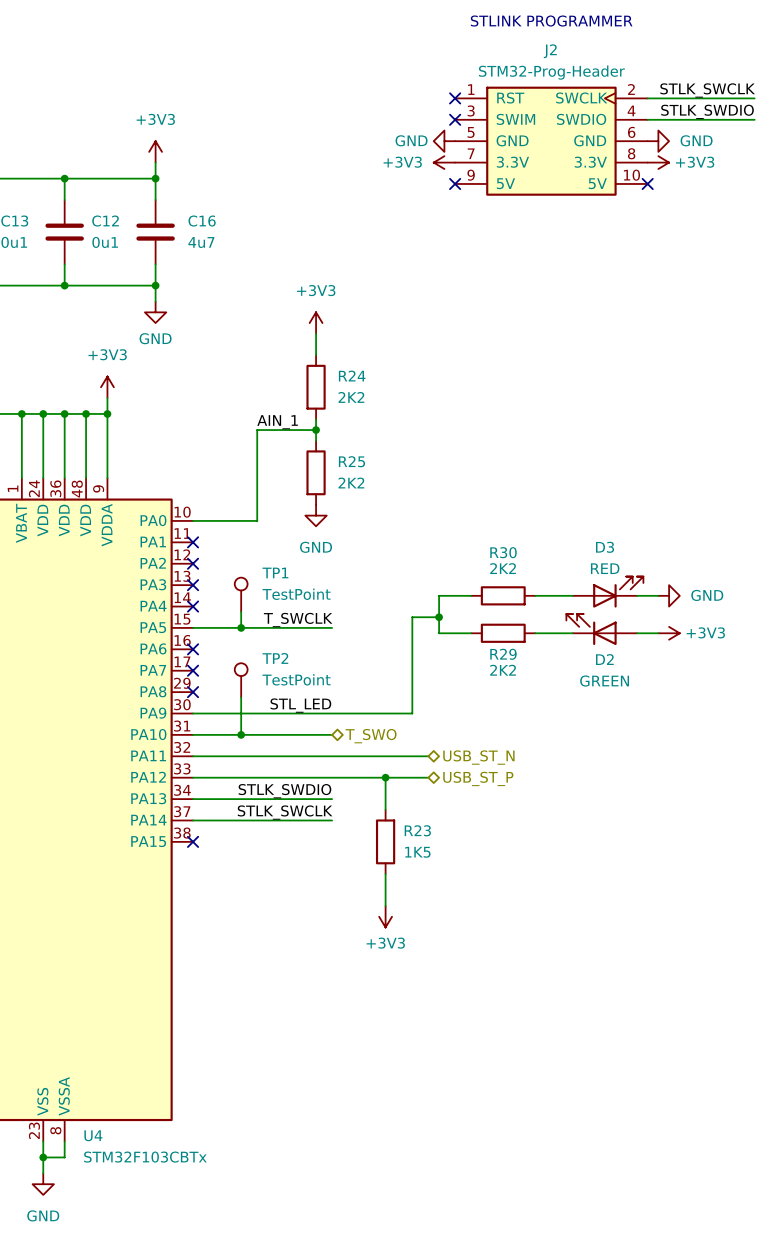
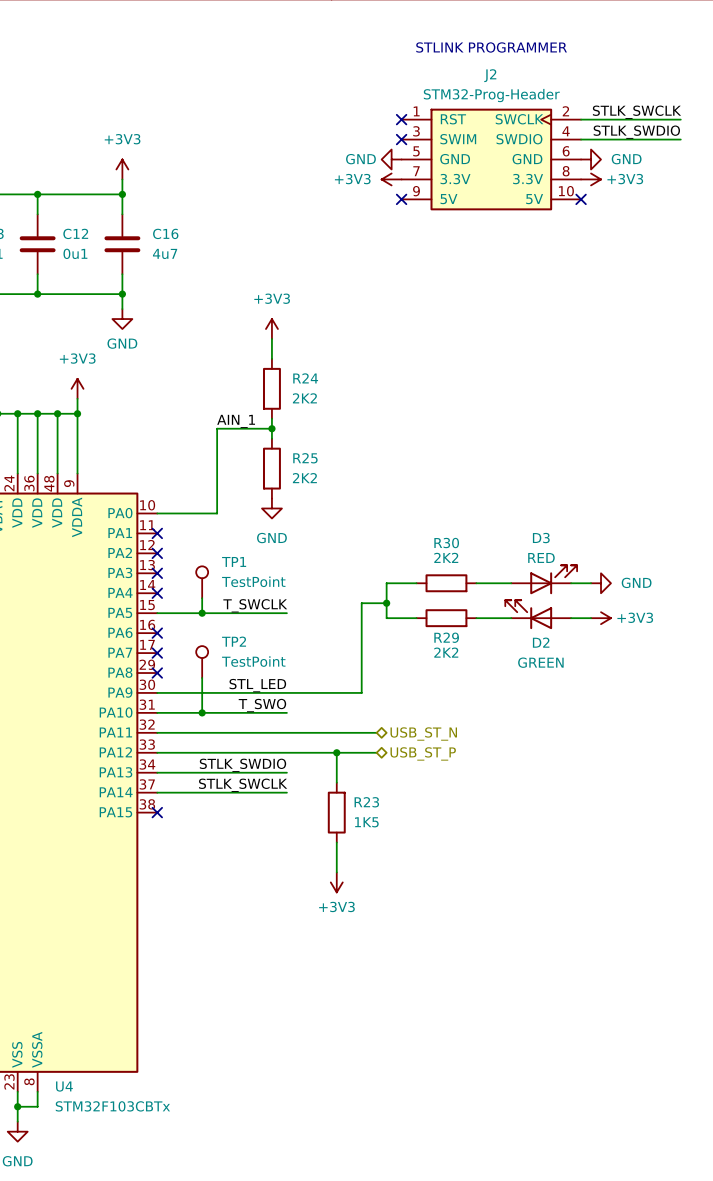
label: none -> T_SWO (262, 705)
hierarchical label: T_SWO (371, 736) -> none

